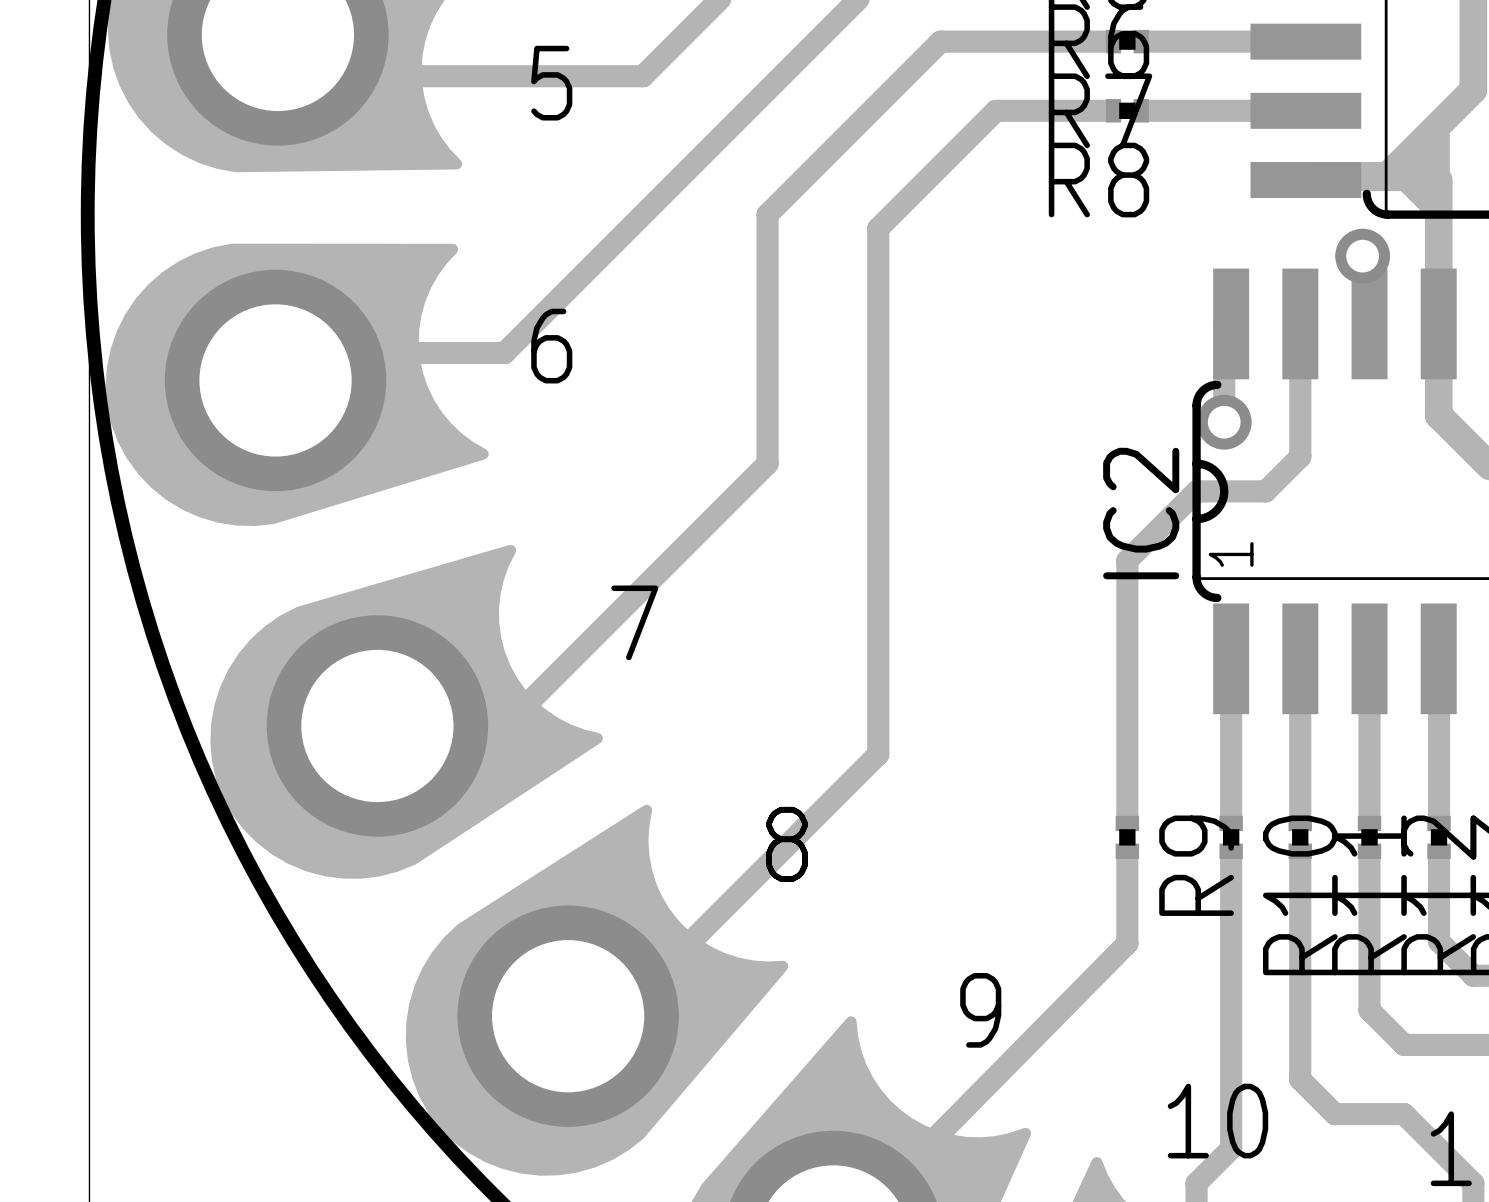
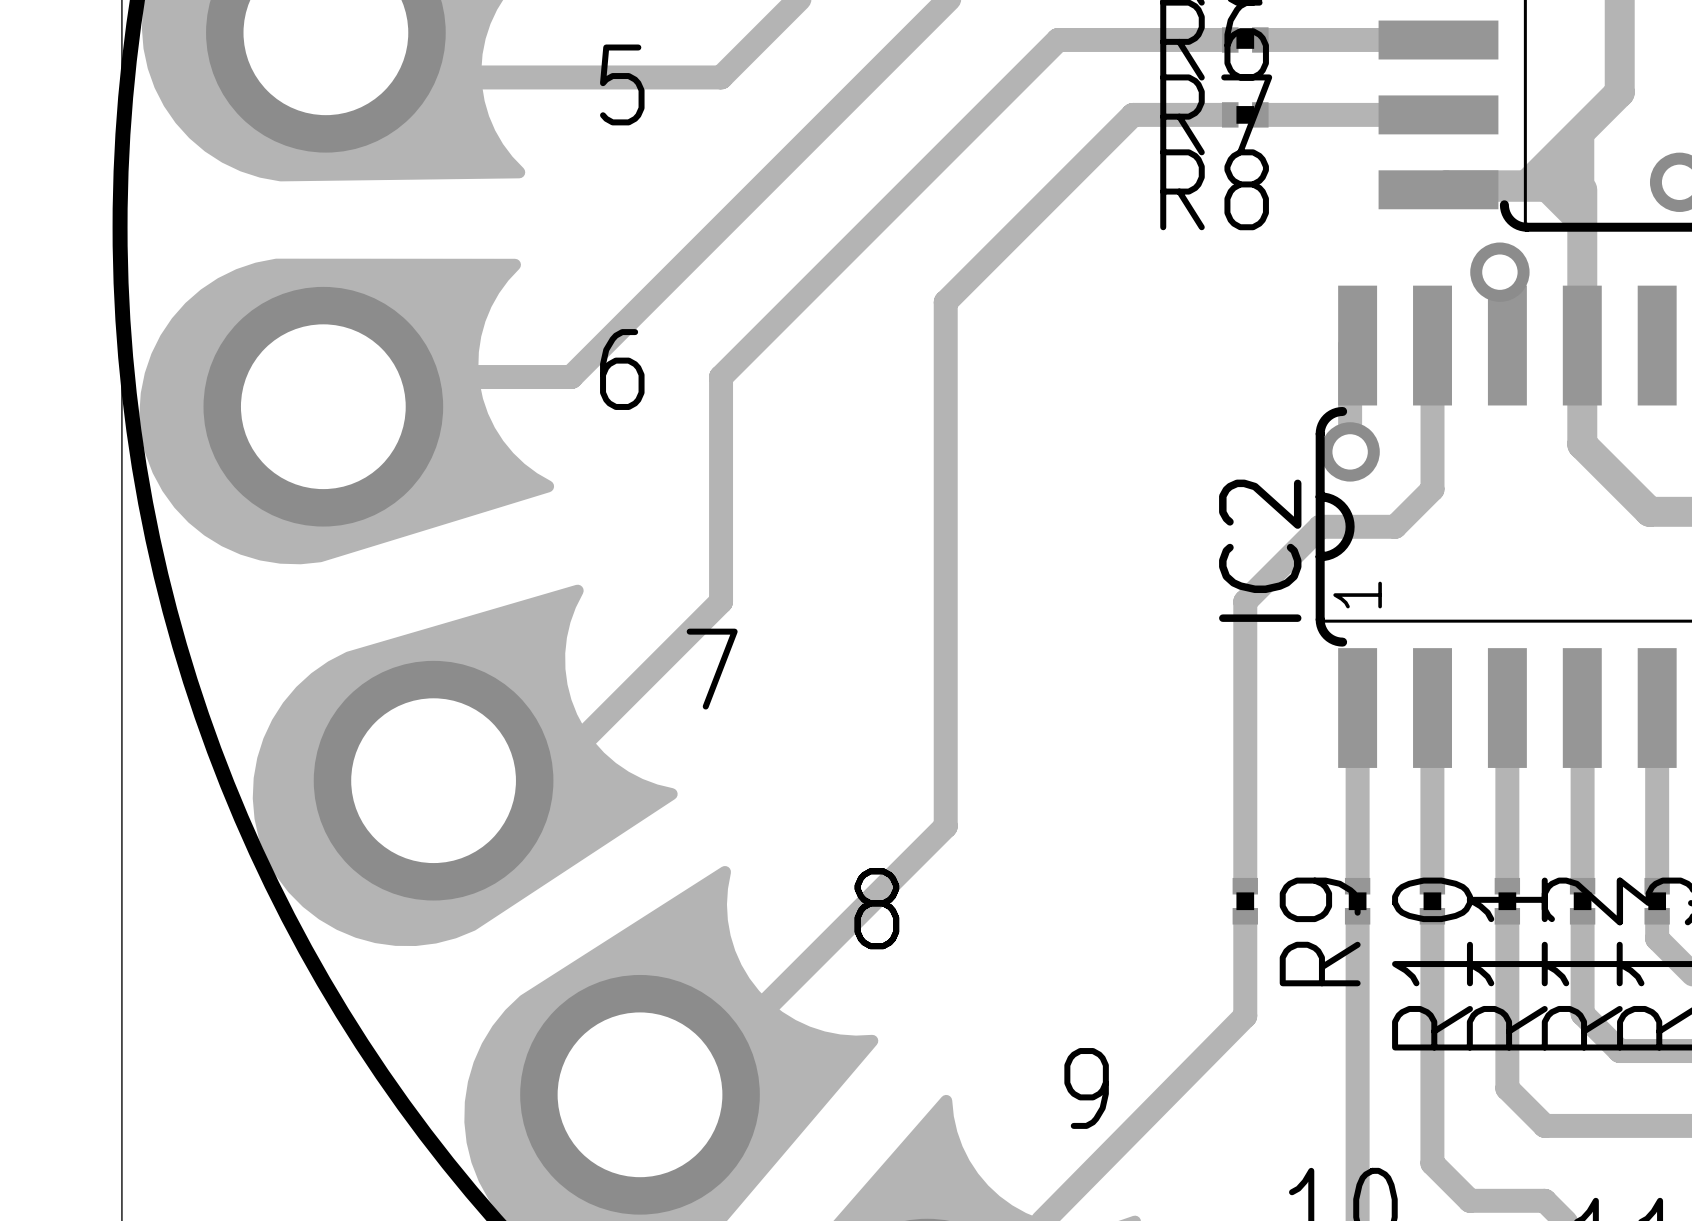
track: (954, 41) (940, 41) (767, 214) (767, 463) (518, 712) (390, 712) (377, 725) -> (1058, 39) (721, 377) (721, 601) (571, 751) (467, 751) (438, 780)
track: (1023, 110) (995, 110) (878, 228) (878, 754) (601, 1031) (583, 1031) (568, 1016) -> (1132, 114) (945, 302) (945, 826) (721, 1051) (688, 1051) (644, 1094)

